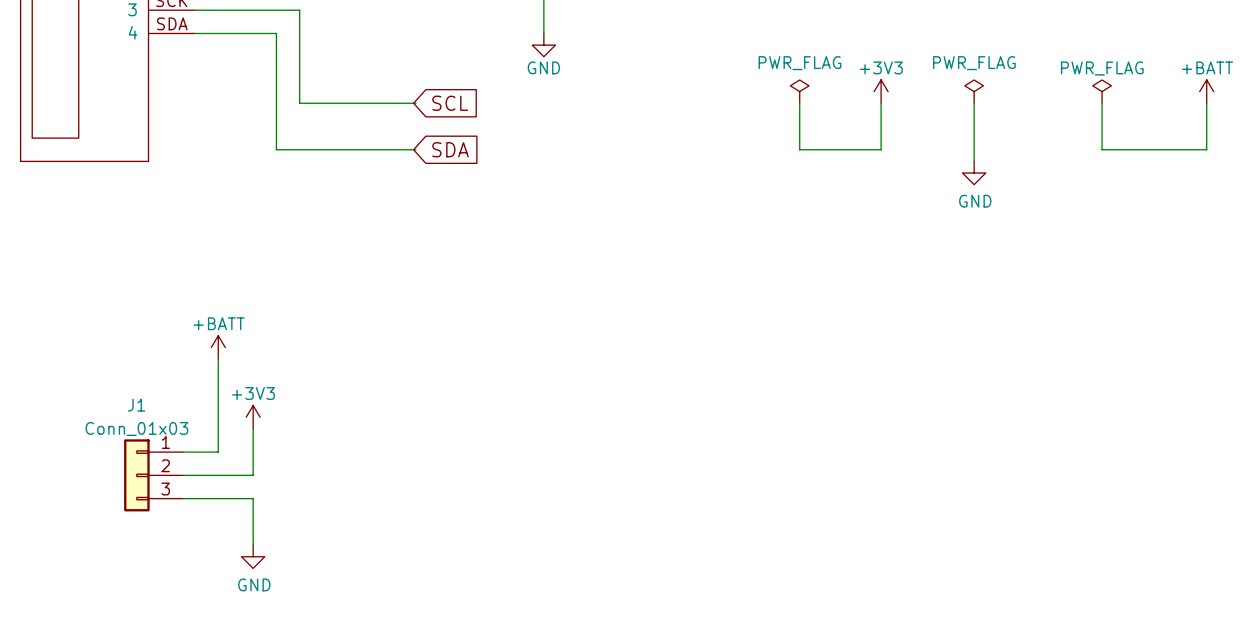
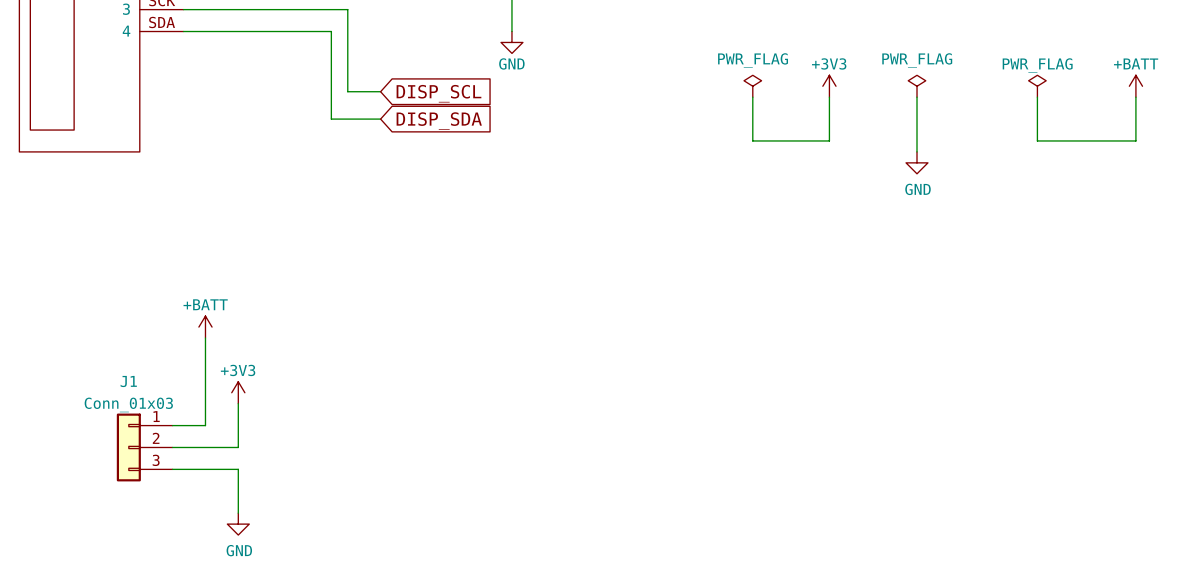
wire: (299, 10) (299, 103) (415, 103) -> (282, 9) (347, 9) (347, 91) (380, 91)
wire: (276, 33) (276, 149) (415, 149) -> (260, 31) (331, 31) (331, 119) (380, 119)
global label: none -> DISP_SCL (438, 93)
global label: SCL (450, 103) -> none
global label: none -> DISP_SDA (439, 121)
global label: SDA (450, 149) -> none

